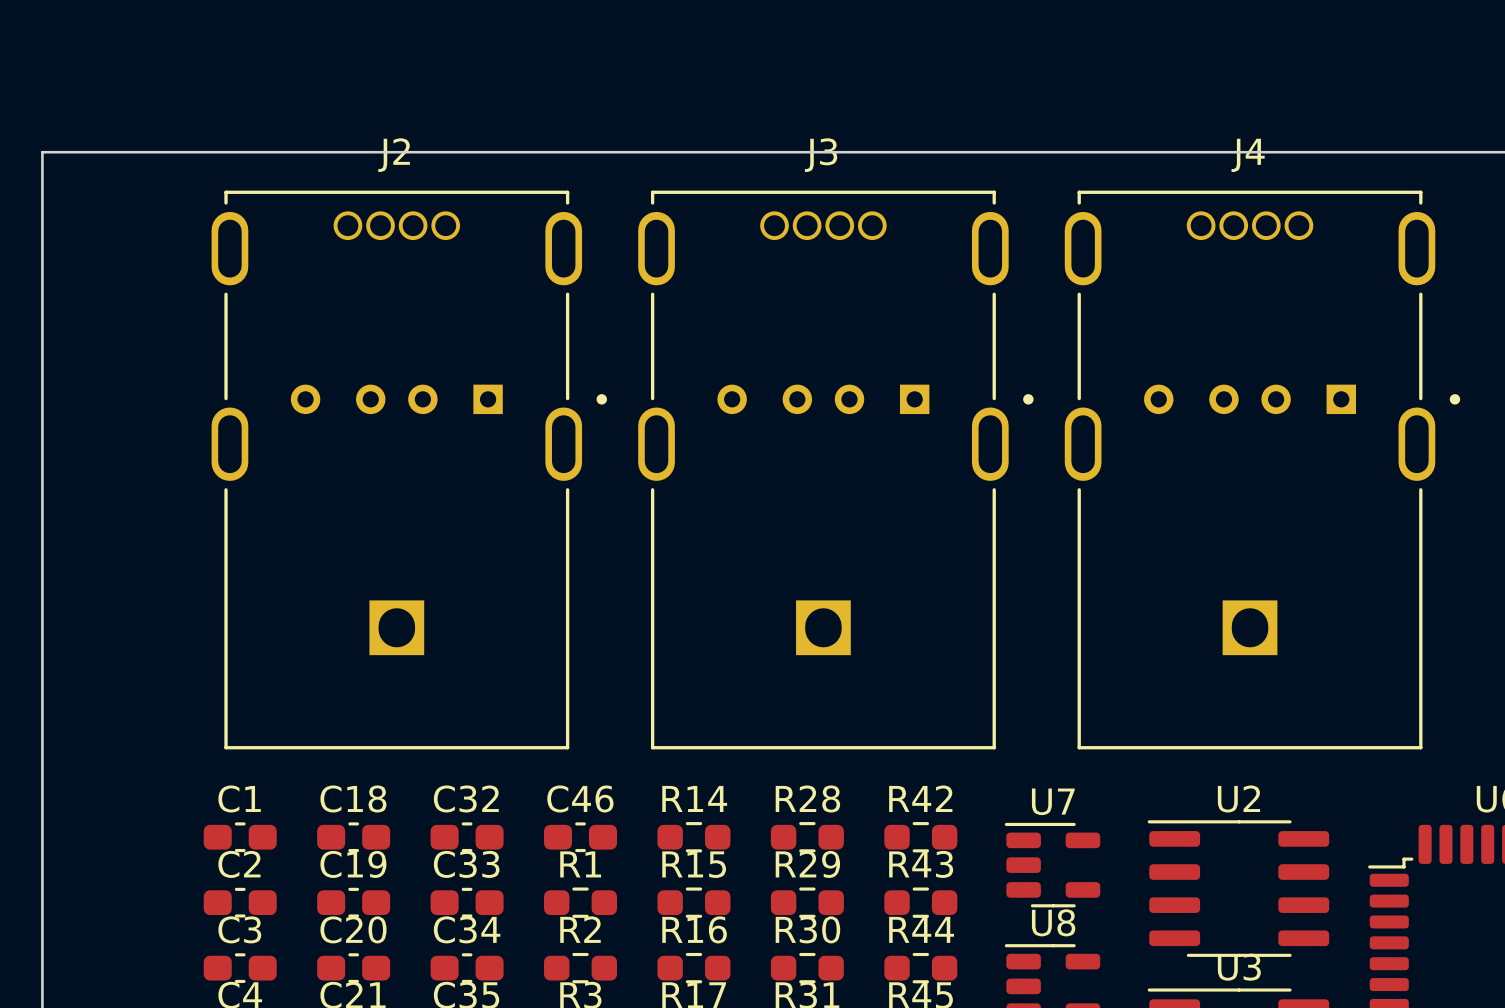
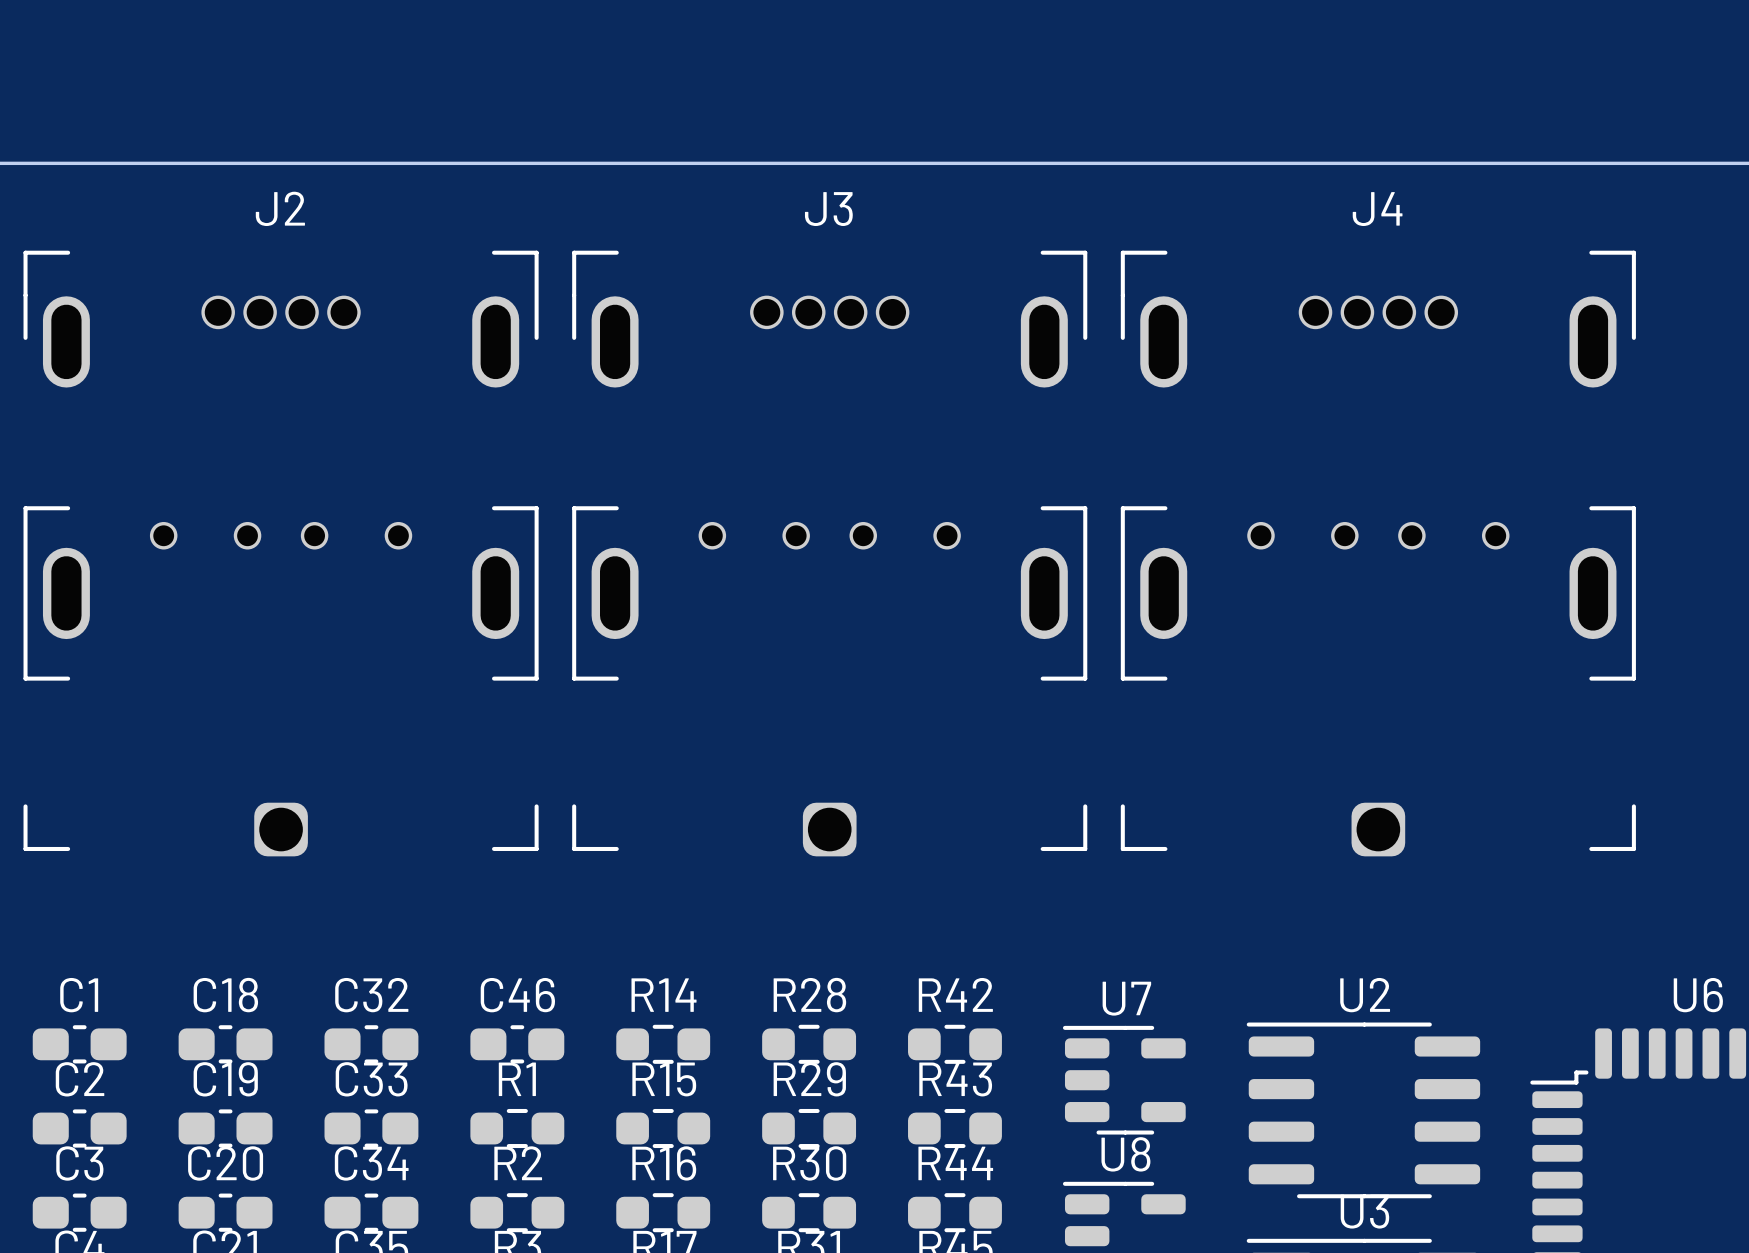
J2 footprint: [211, 190, 607, 750] -> [23, 250, 539, 857]
J3 footprint: [638, 190, 1034, 750] -> [572, 250, 1088, 857]
J4 footprint: [1064, 190, 1461, 750] -> [1120, 250, 1636, 857]

